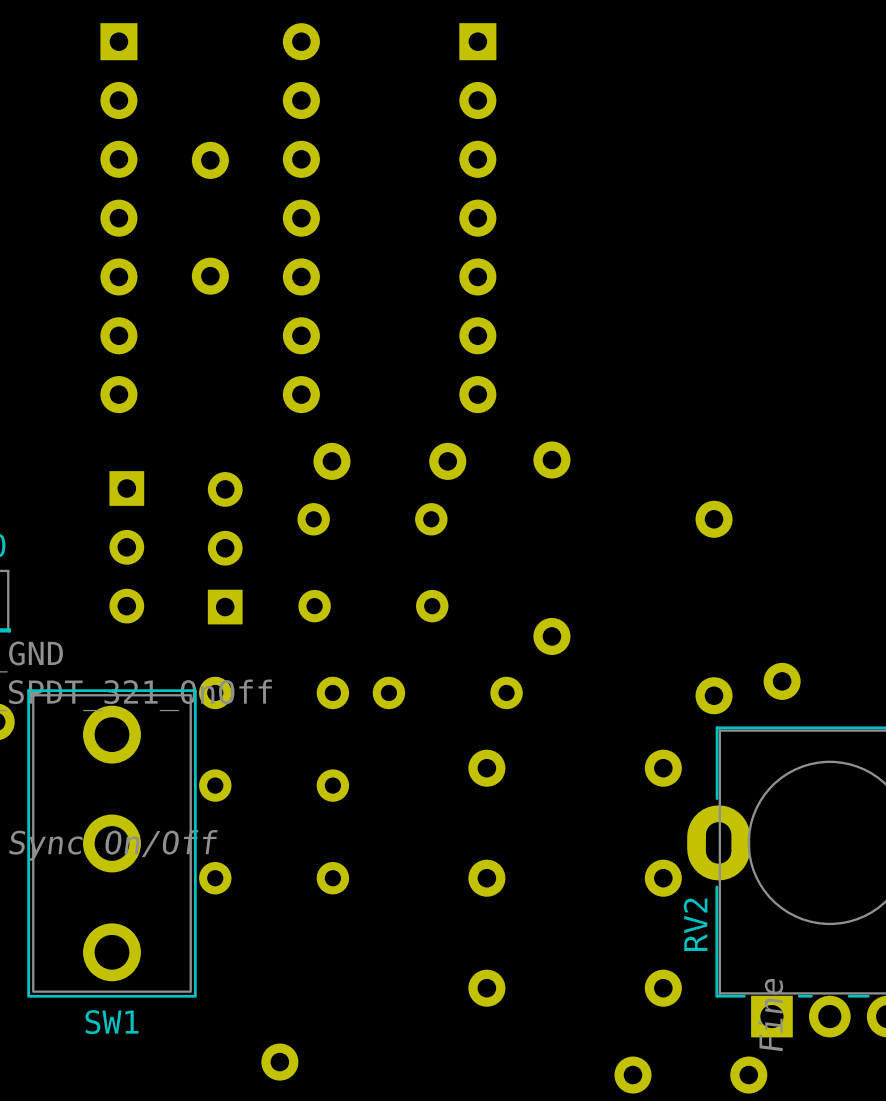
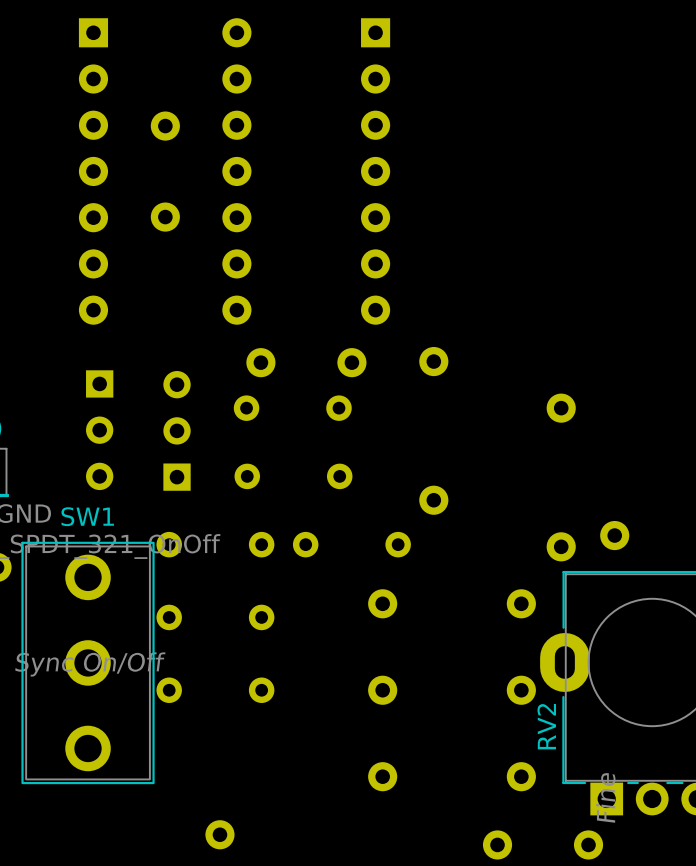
SW1 name position: SW1 (111, 1022) -> SW1 (87, 516)

